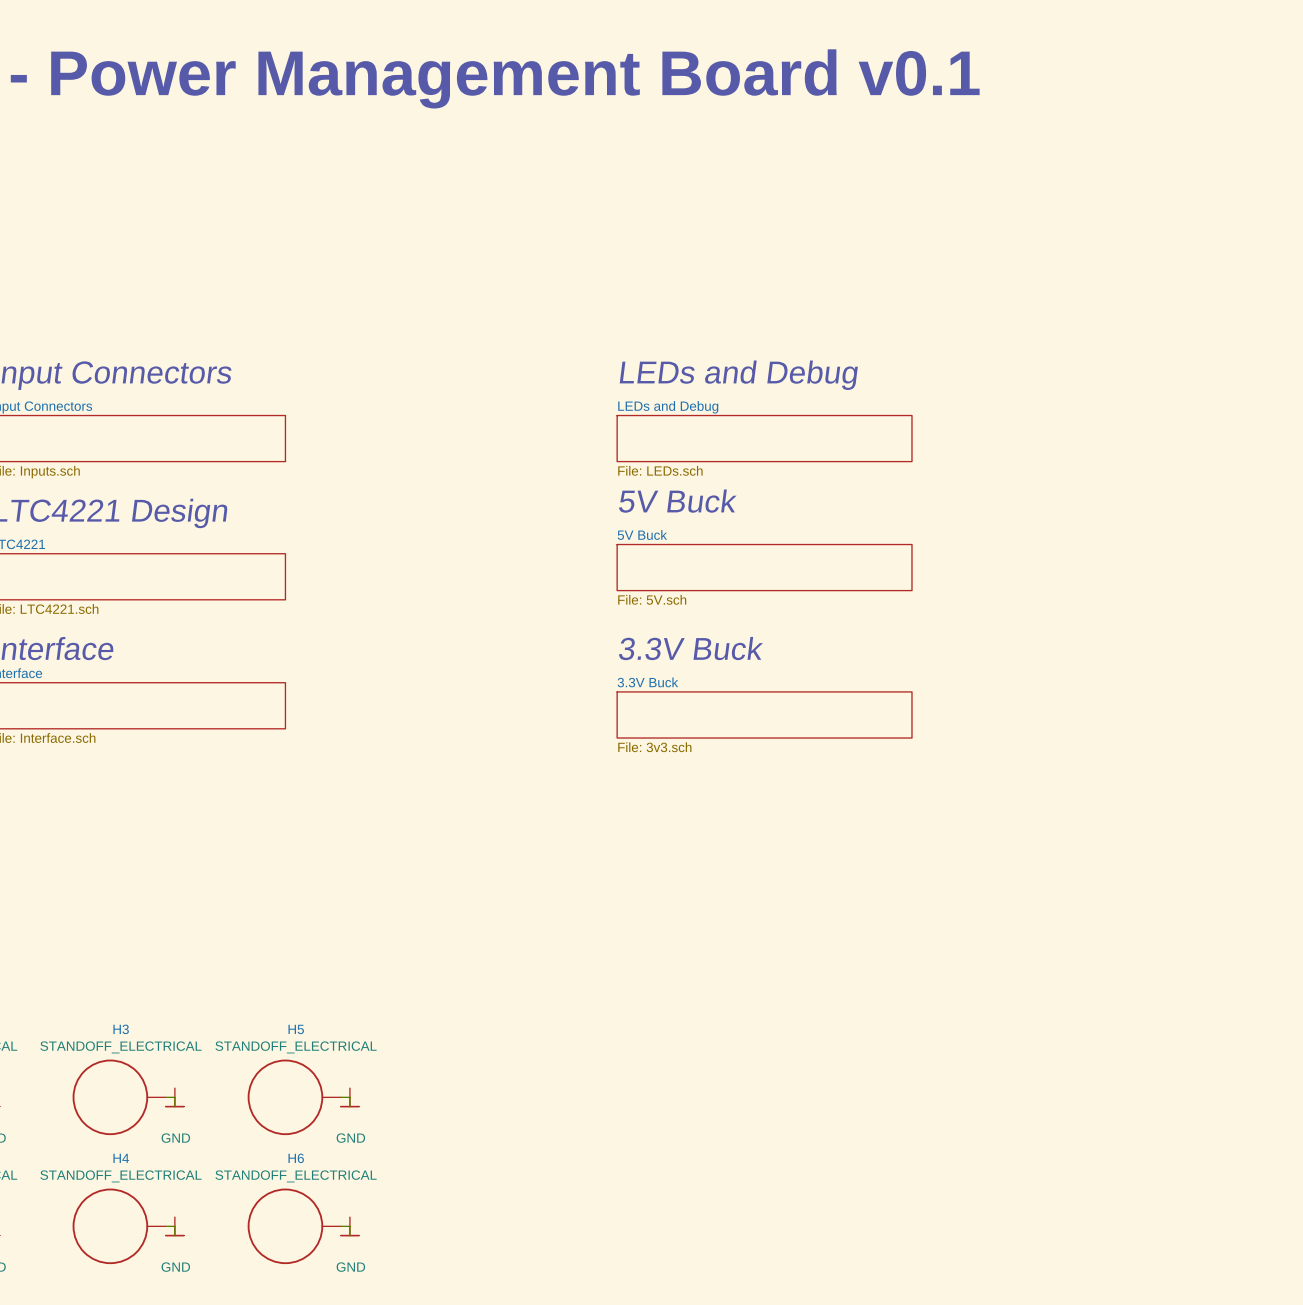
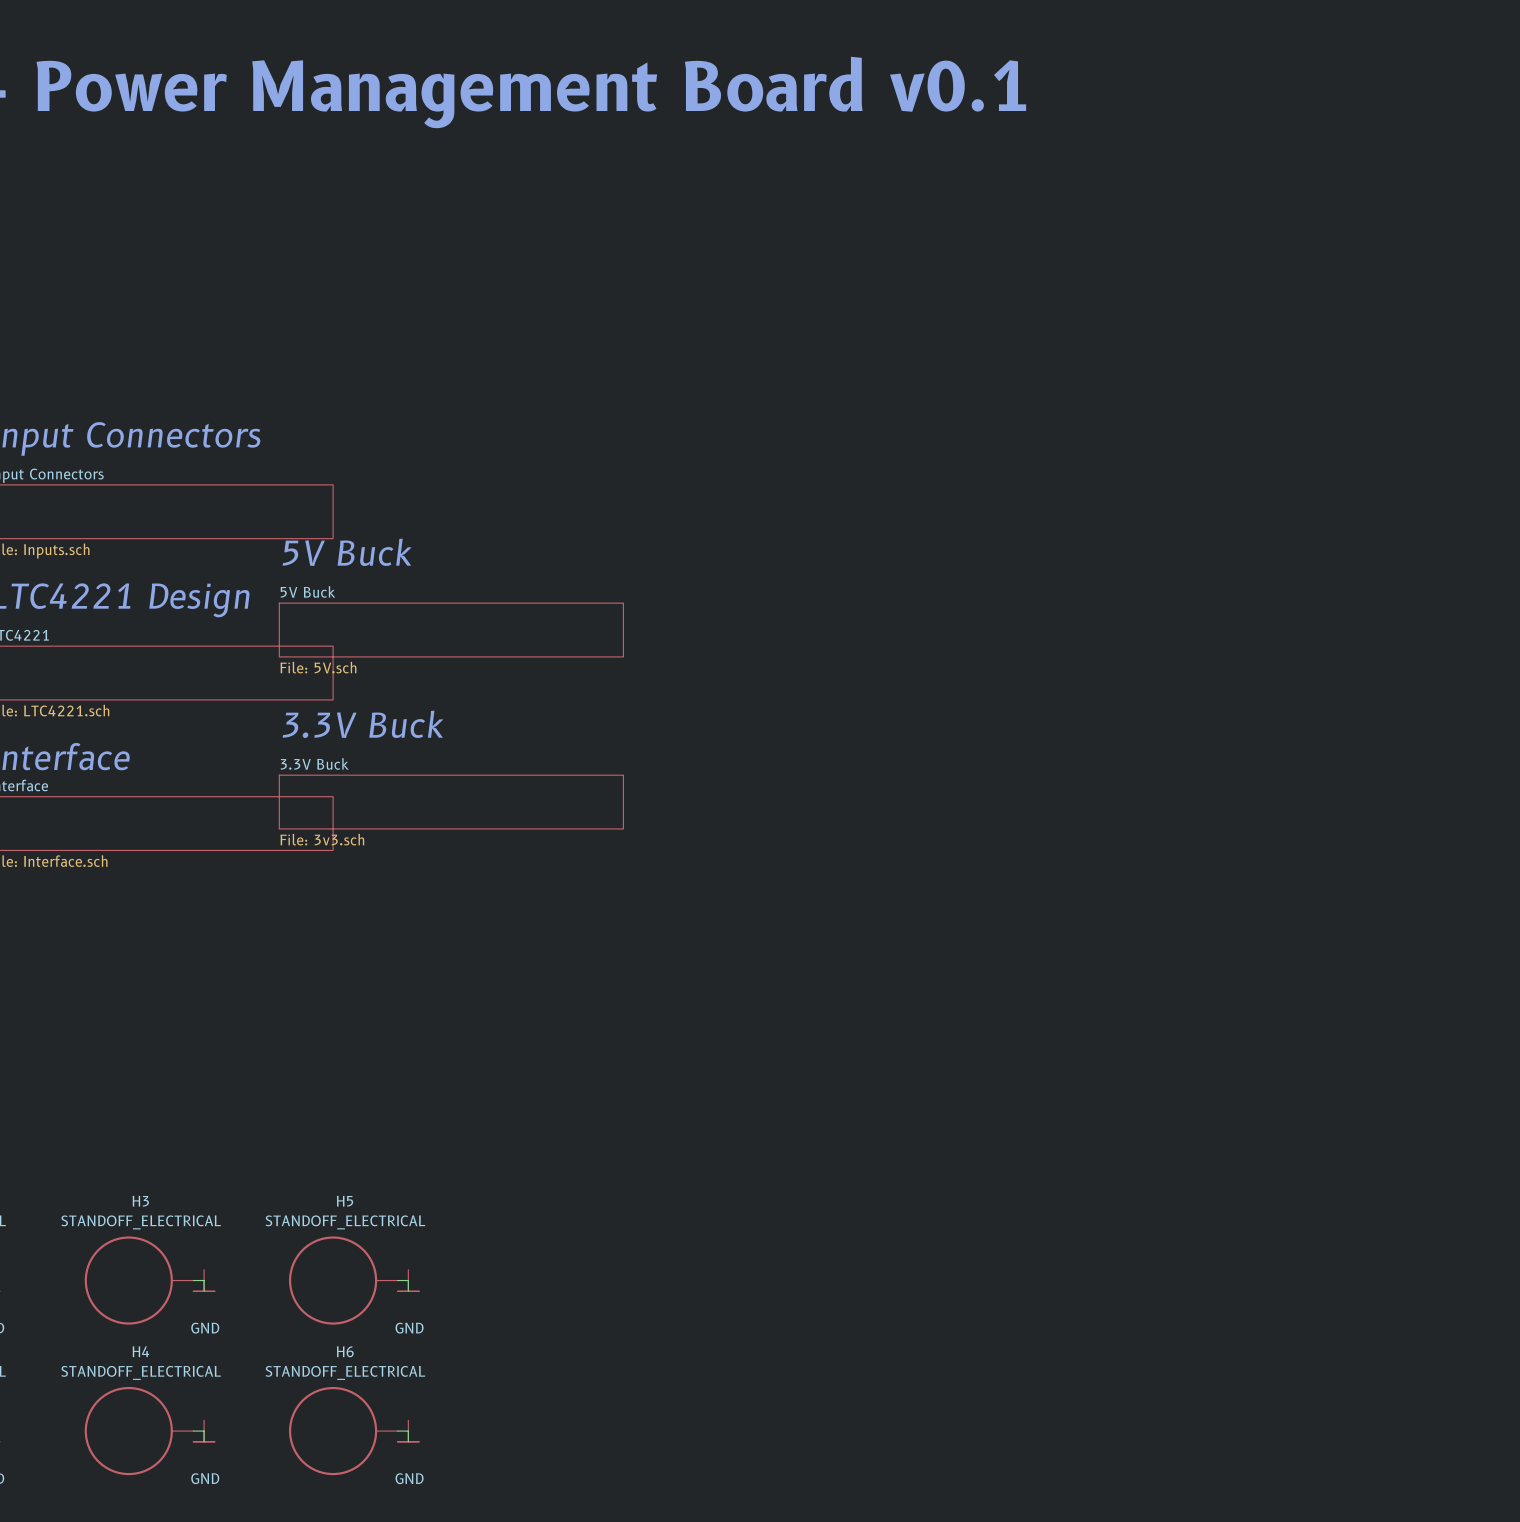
text: LEDs and Debug (738, 375) -> none
sheet LEDs and Debug: File: LEDs.sch (764, 438) -> none
text: none -> 5V Buck (347, 552)
text: 5V Buck (677, 501) -> none
sheet 5V Buck position: (764, 567) -> (451, 630)
text: none -> 3.3V Buck (363, 724)
text: 3.3V Buck (691, 648) -> none
sheet 3.3V Buck position: (764, 714) -> (451, 802)

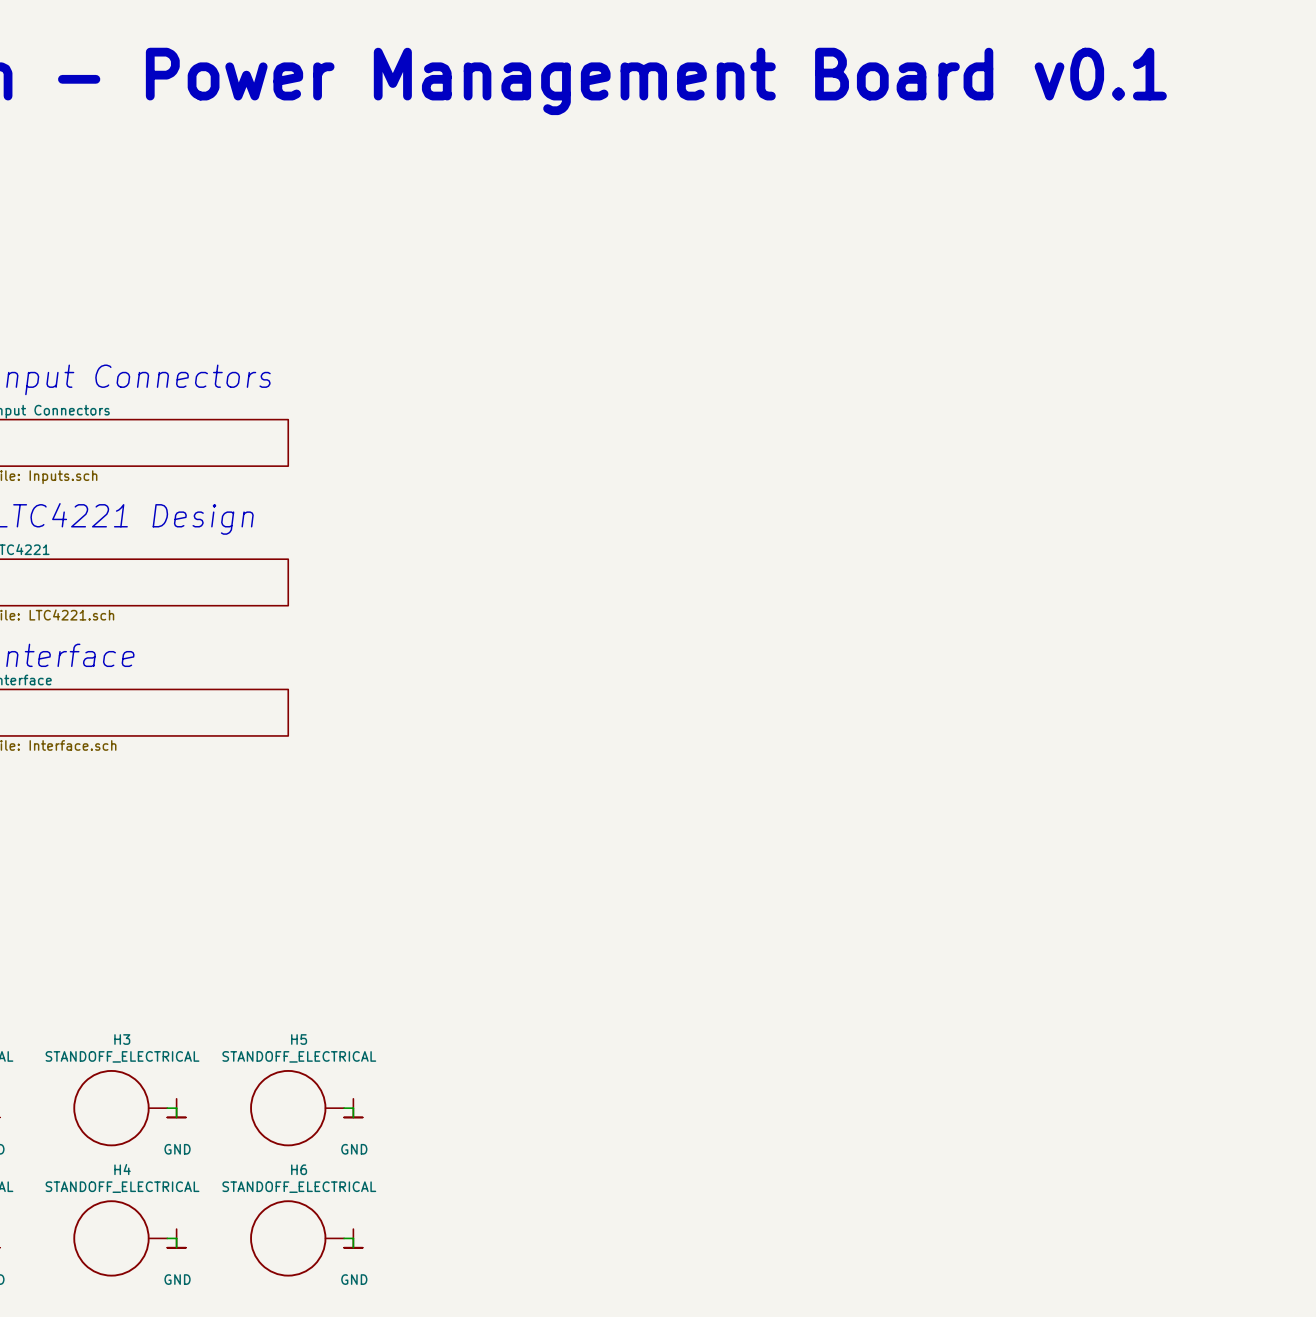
text: 5V Buck (347, 552) -> none
sheet 5V Buck: File: 5V.sch (451, 630) -> none
text: 3.3V Buck (363, 724) -> none
sheet 3.3V Buck: File: 3v3.sch (451, 802) -> none

